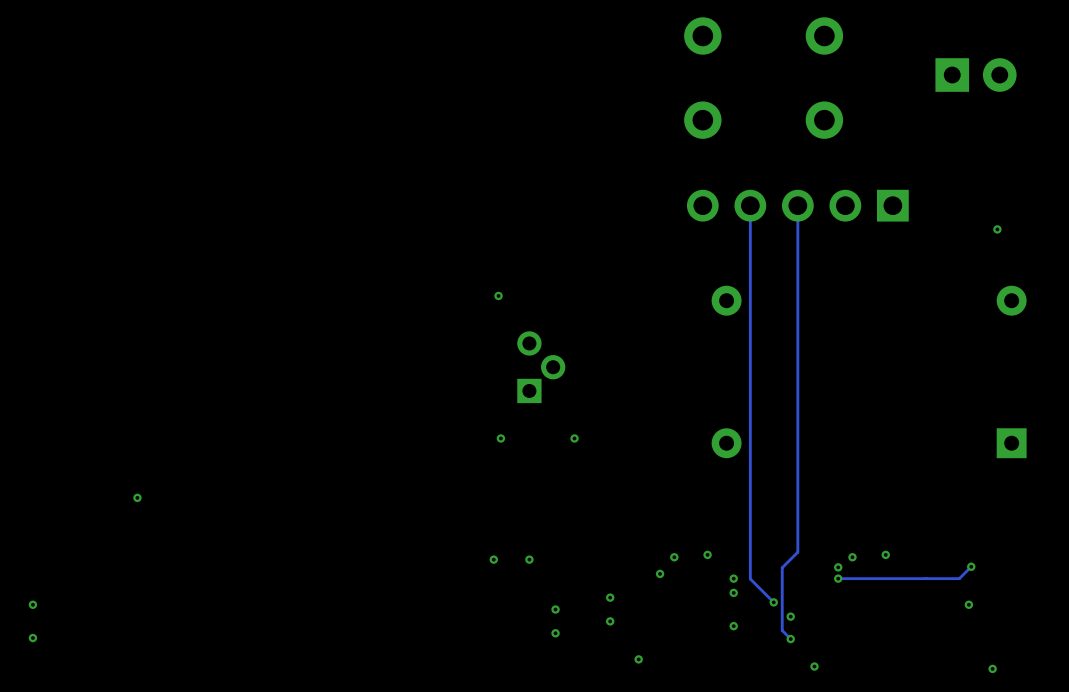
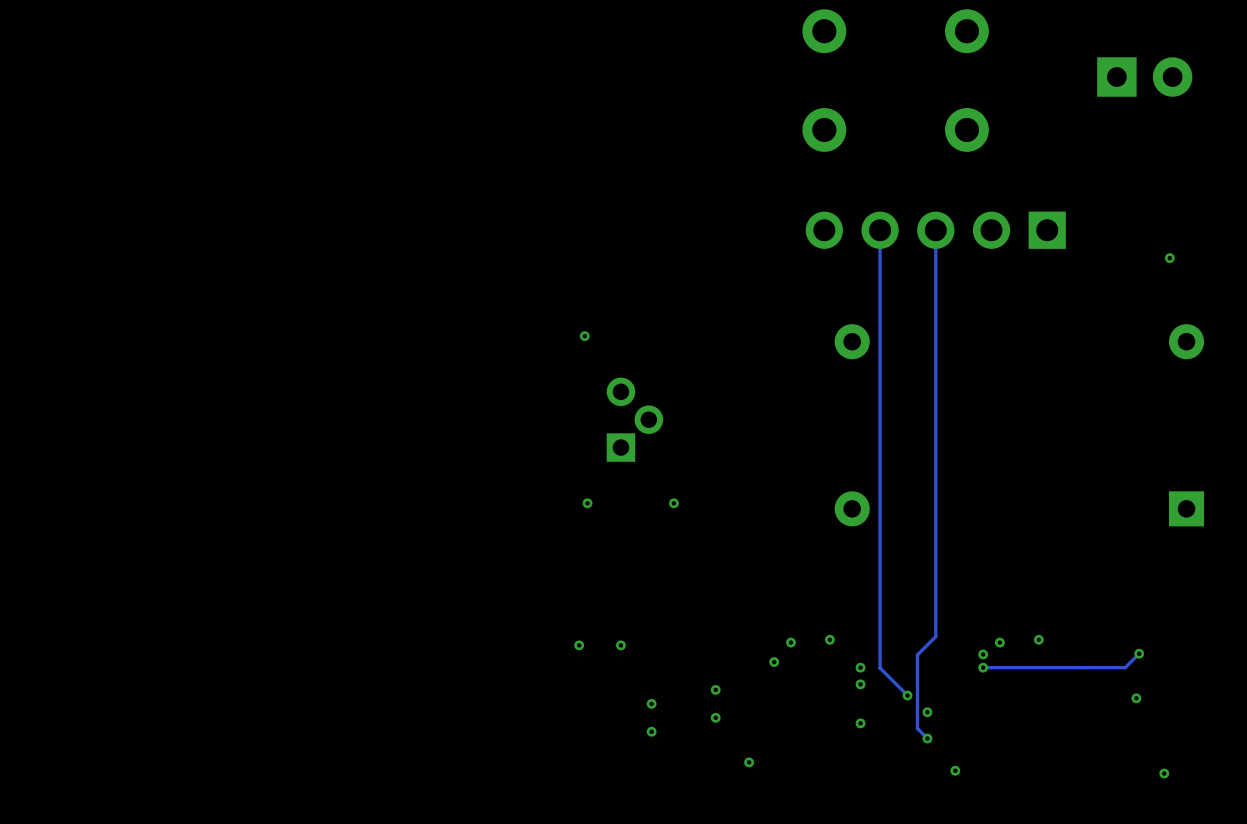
via: (137, 497) -> none
via: (32, 604) -> none
via: (32, 638) -> none

